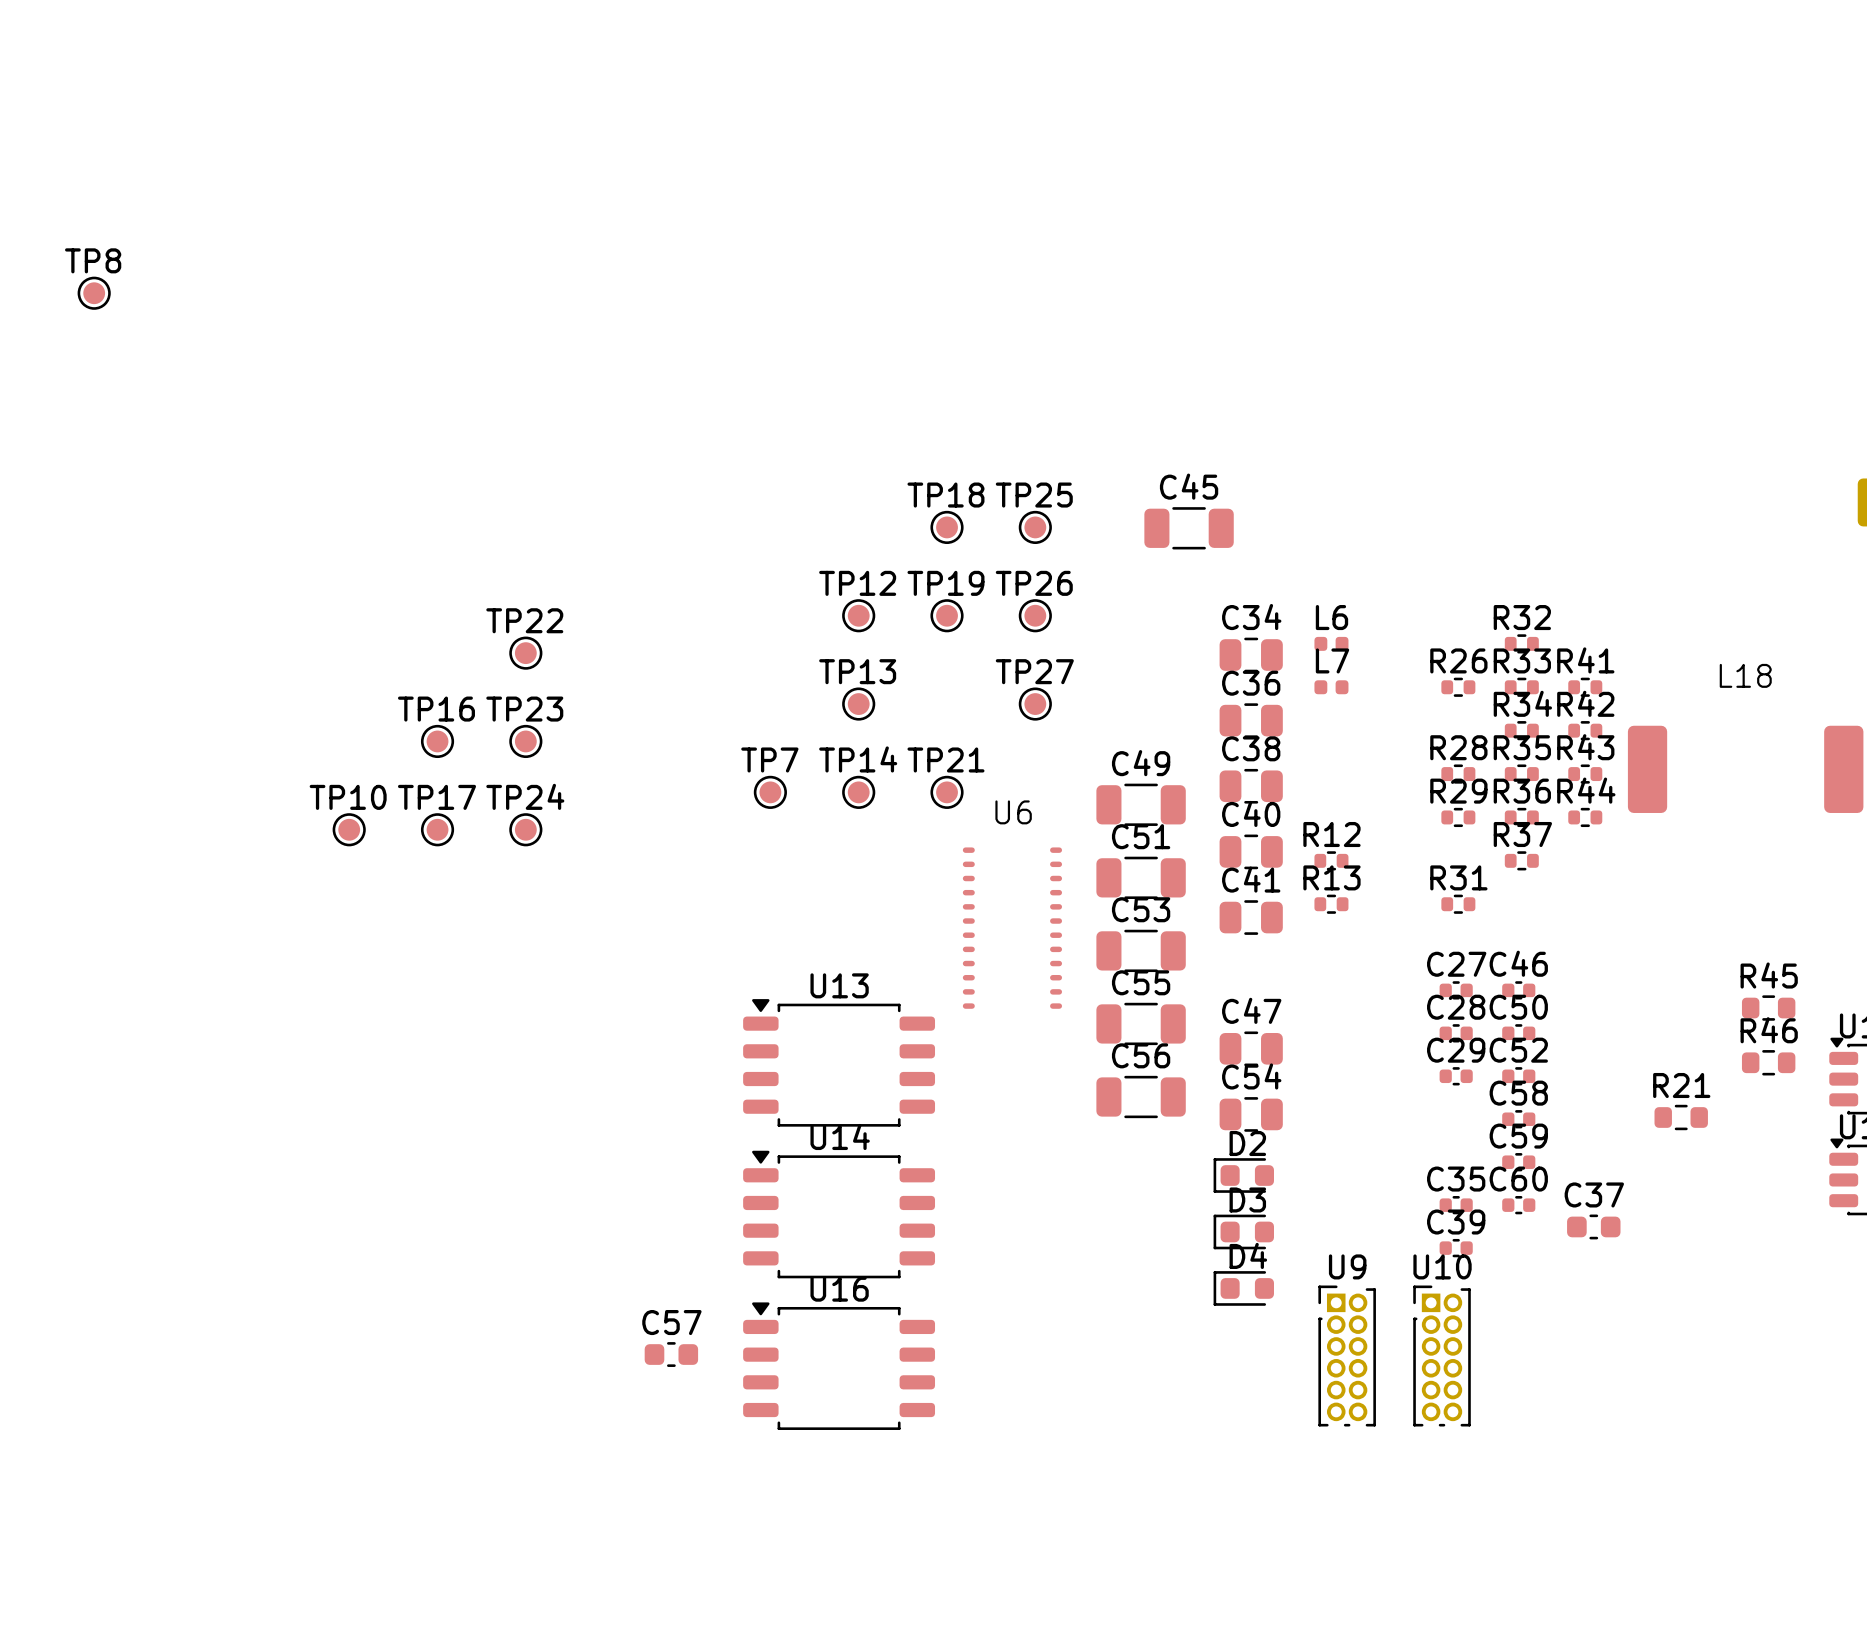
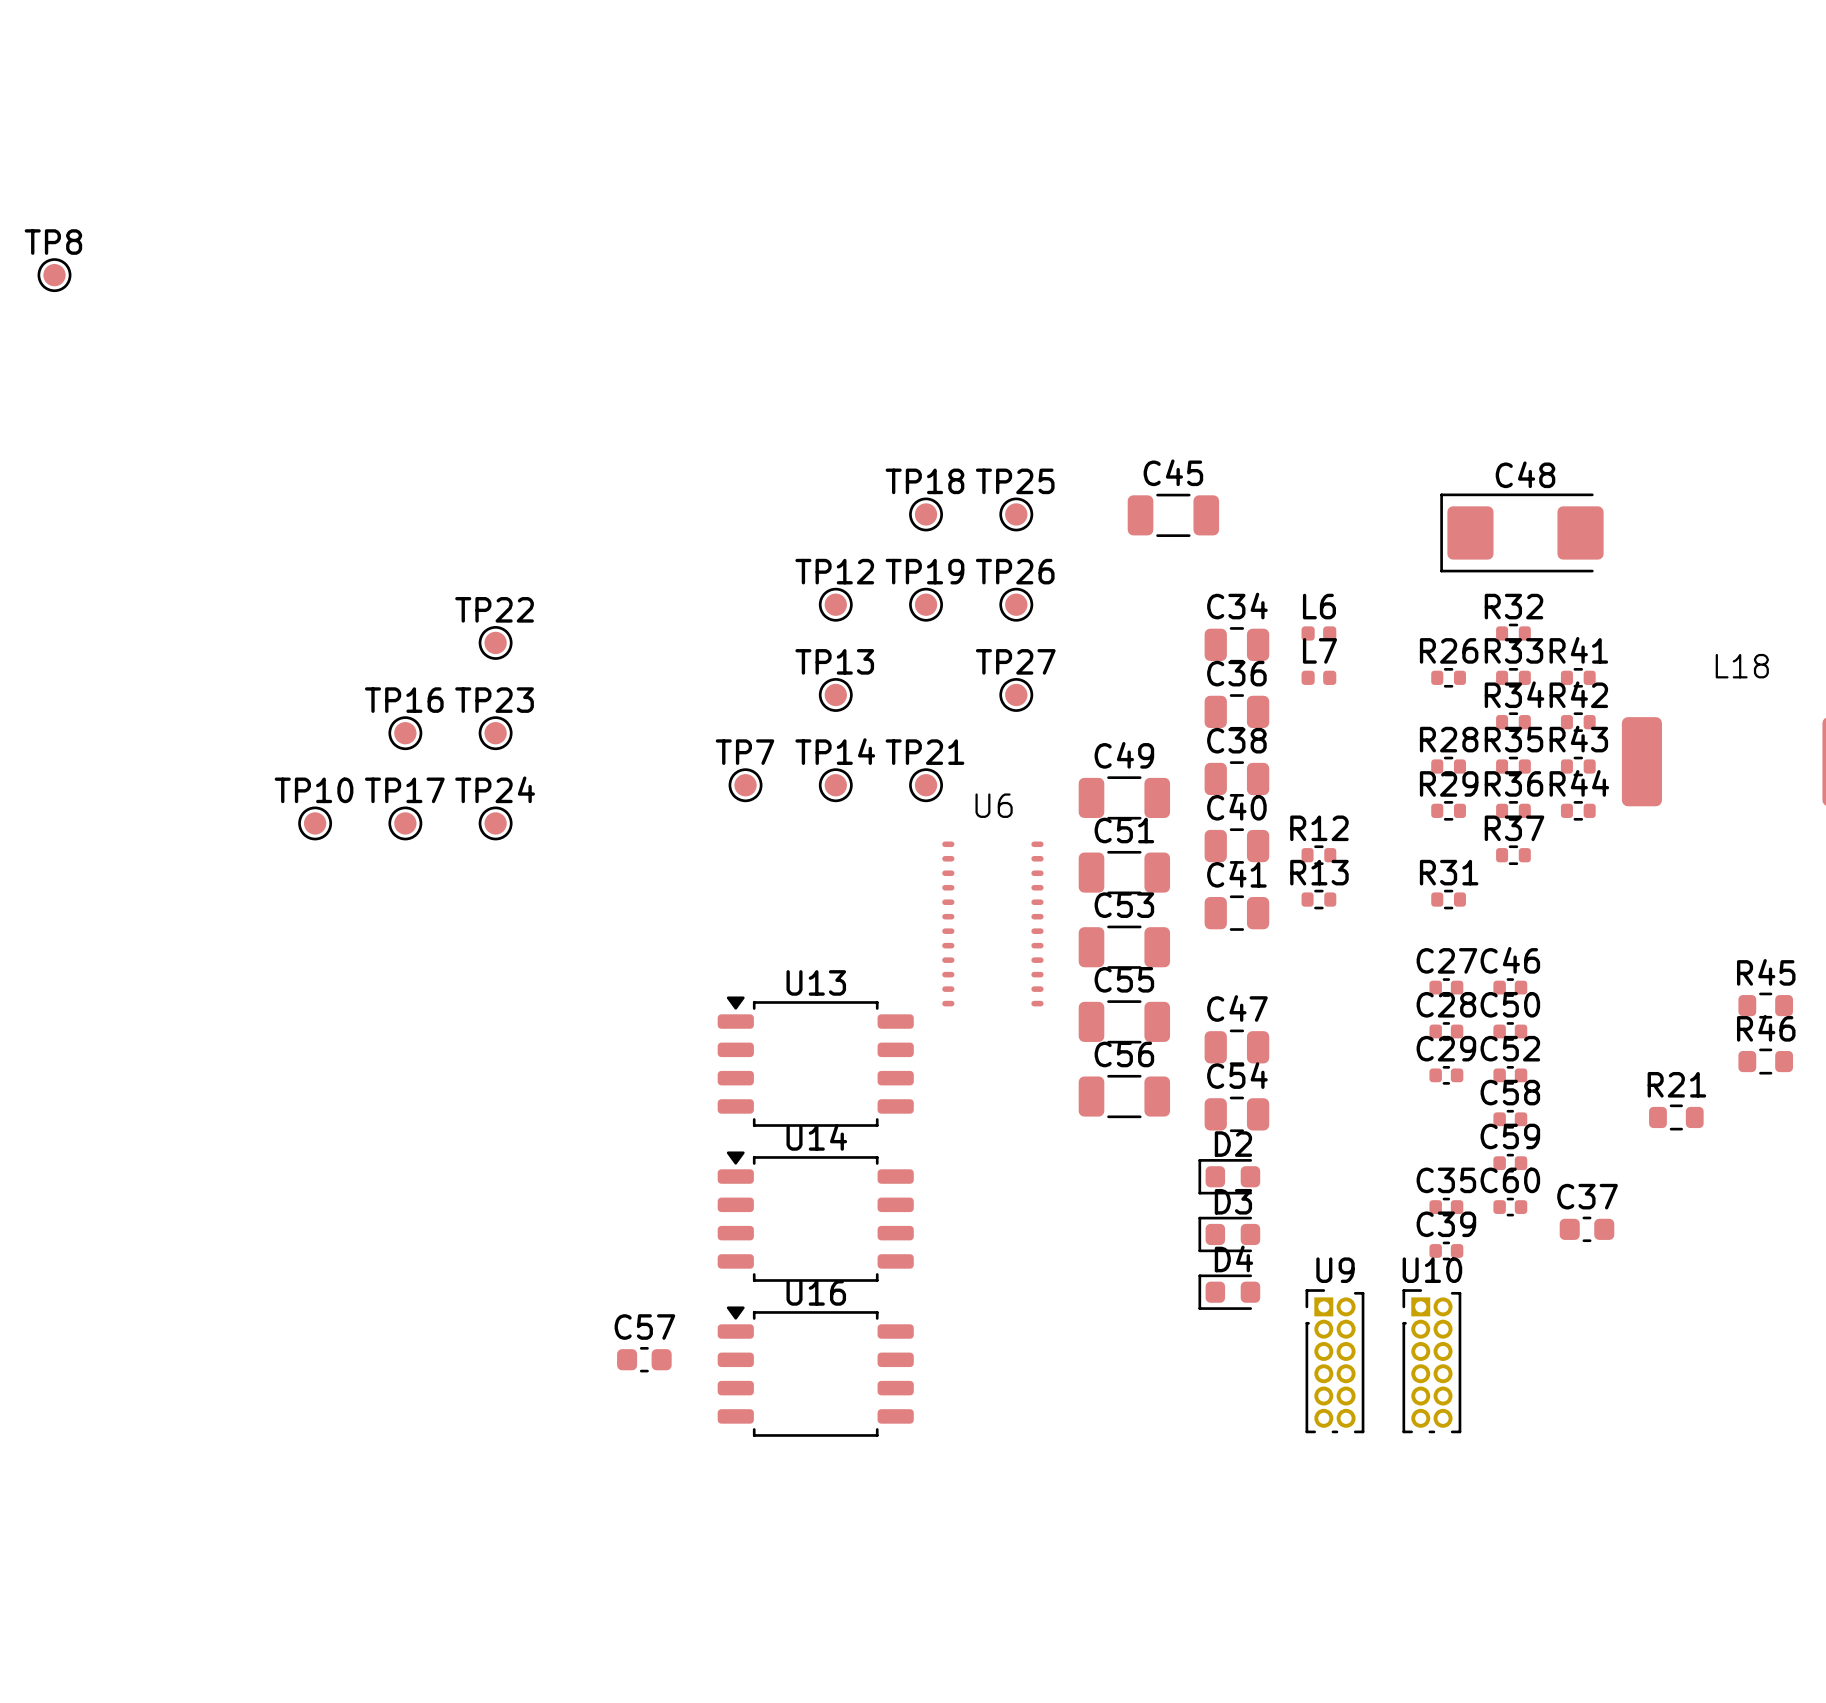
C48: none -> (1521, 532)

